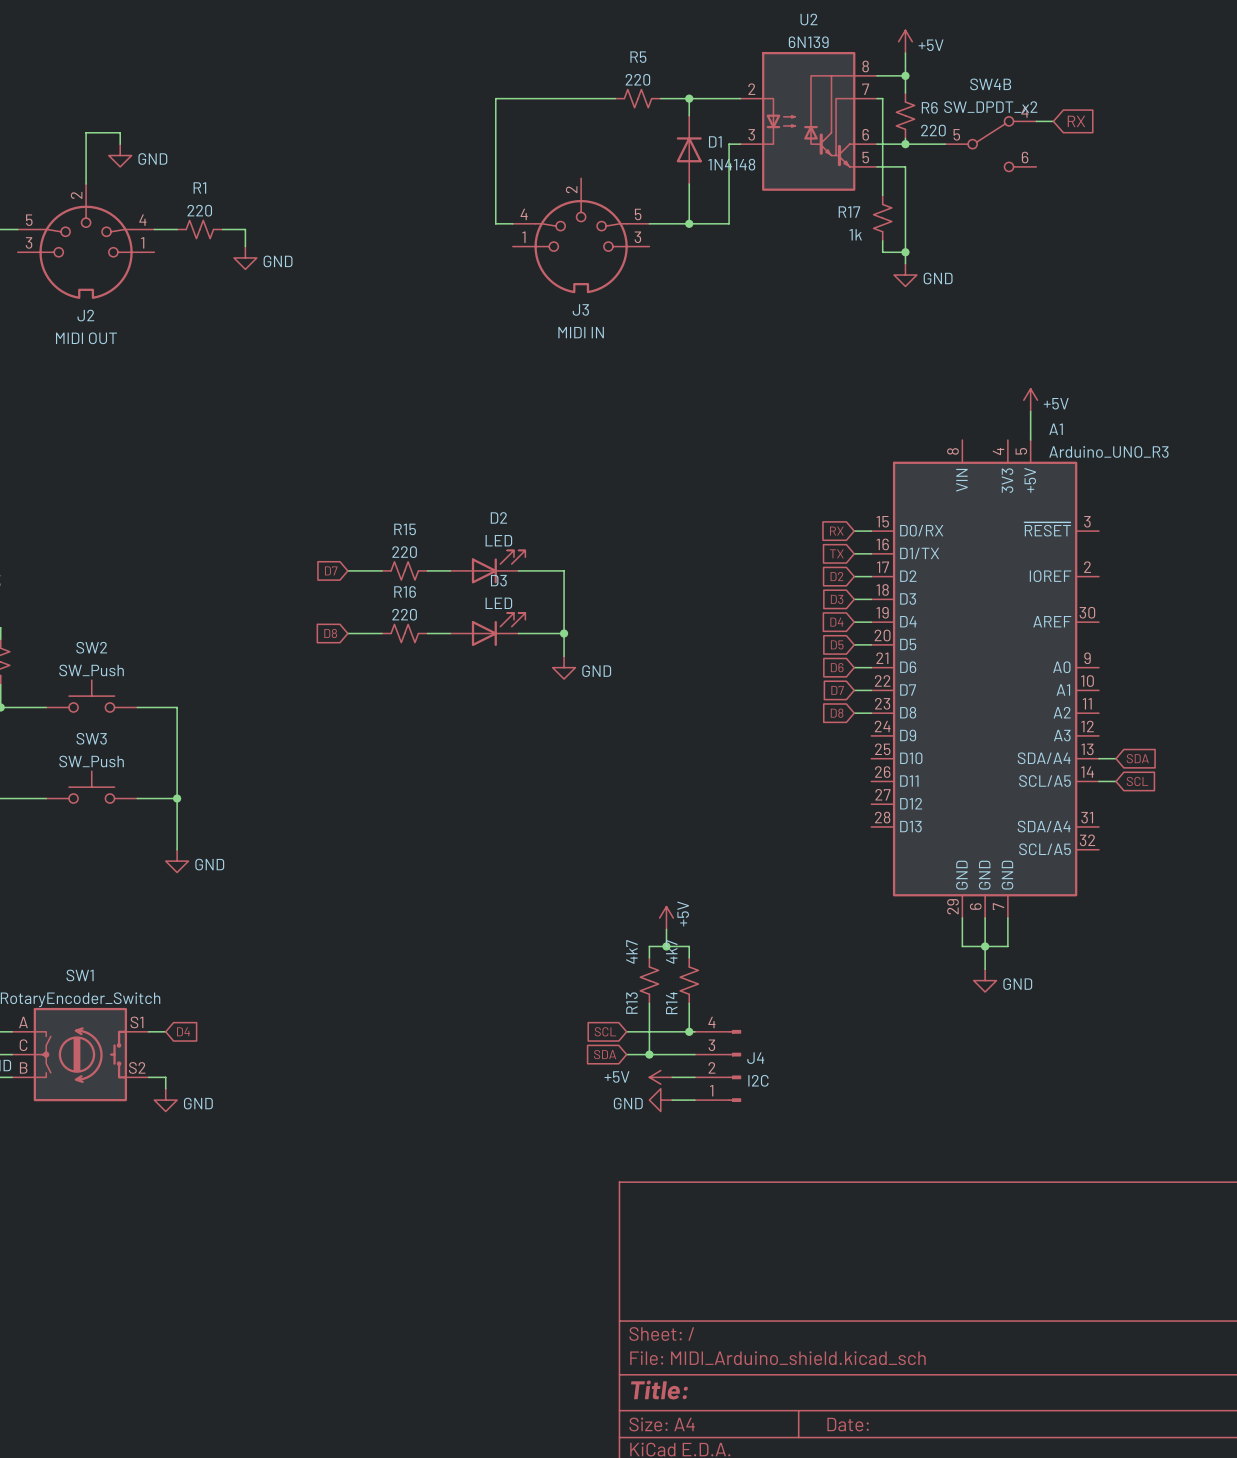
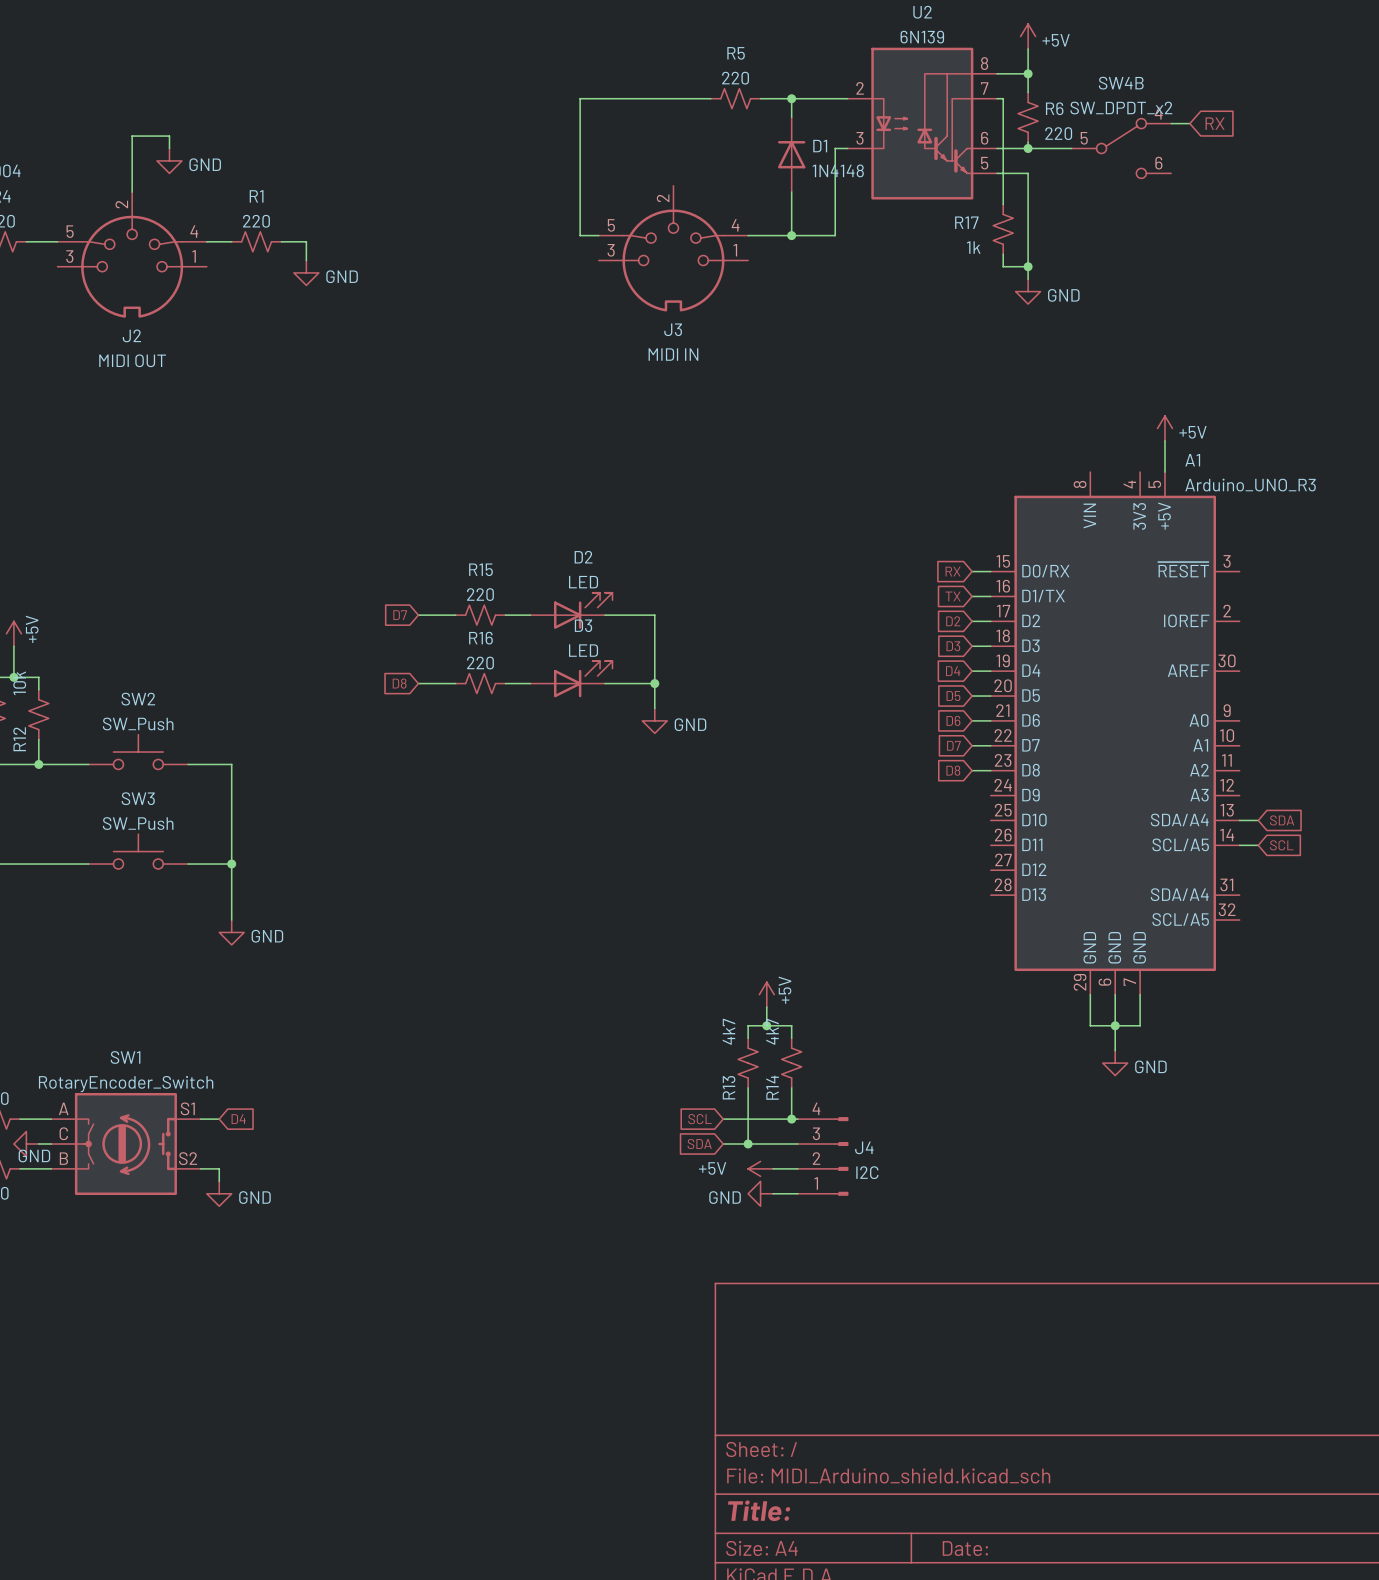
J3 flip: as is (581, 246) -> left-right (673, 260)

